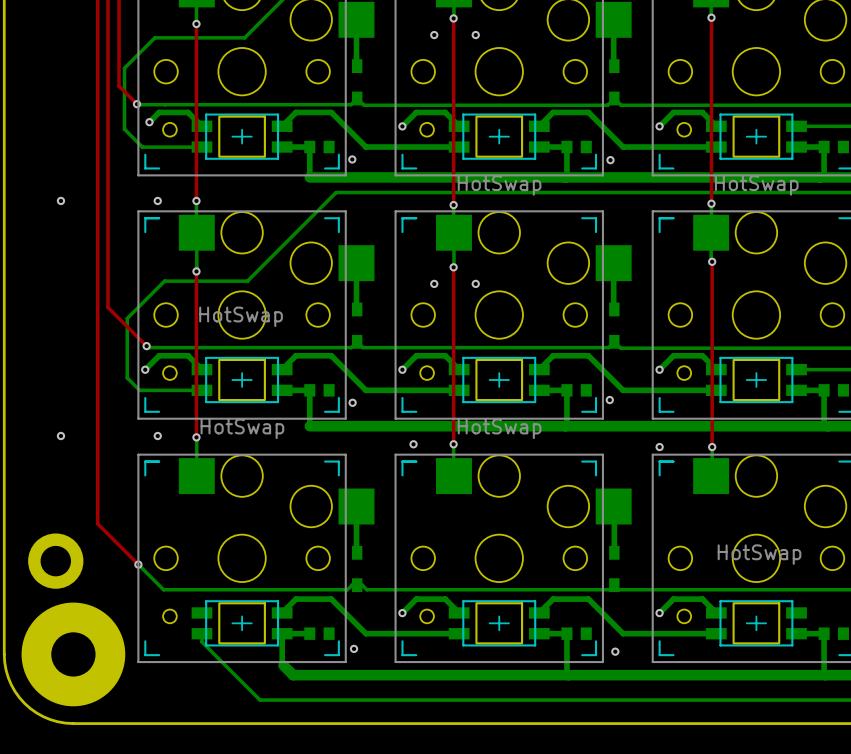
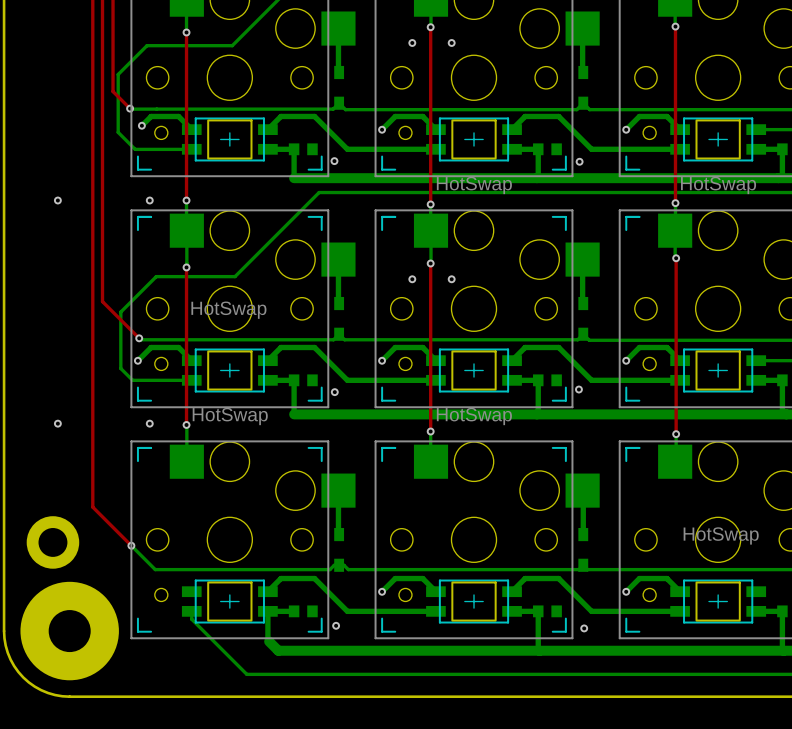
via: (413, 444) -> none
via: (659, 447) -> none

